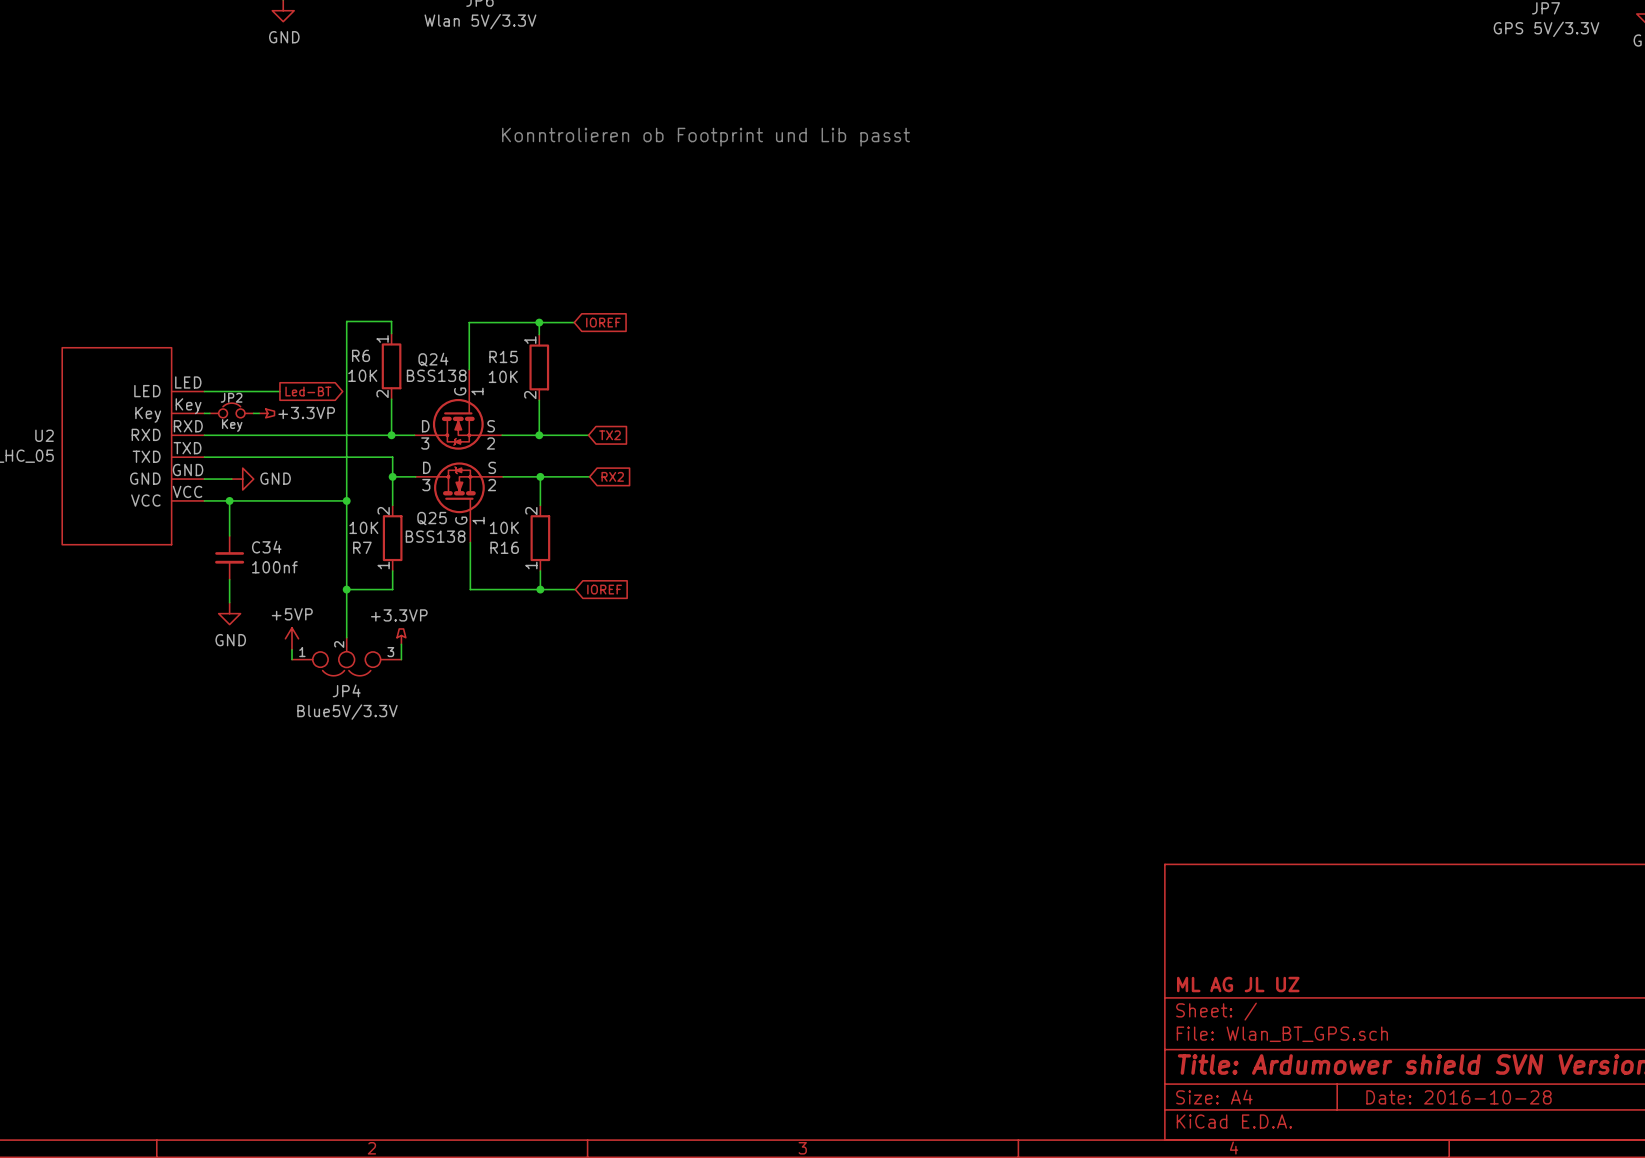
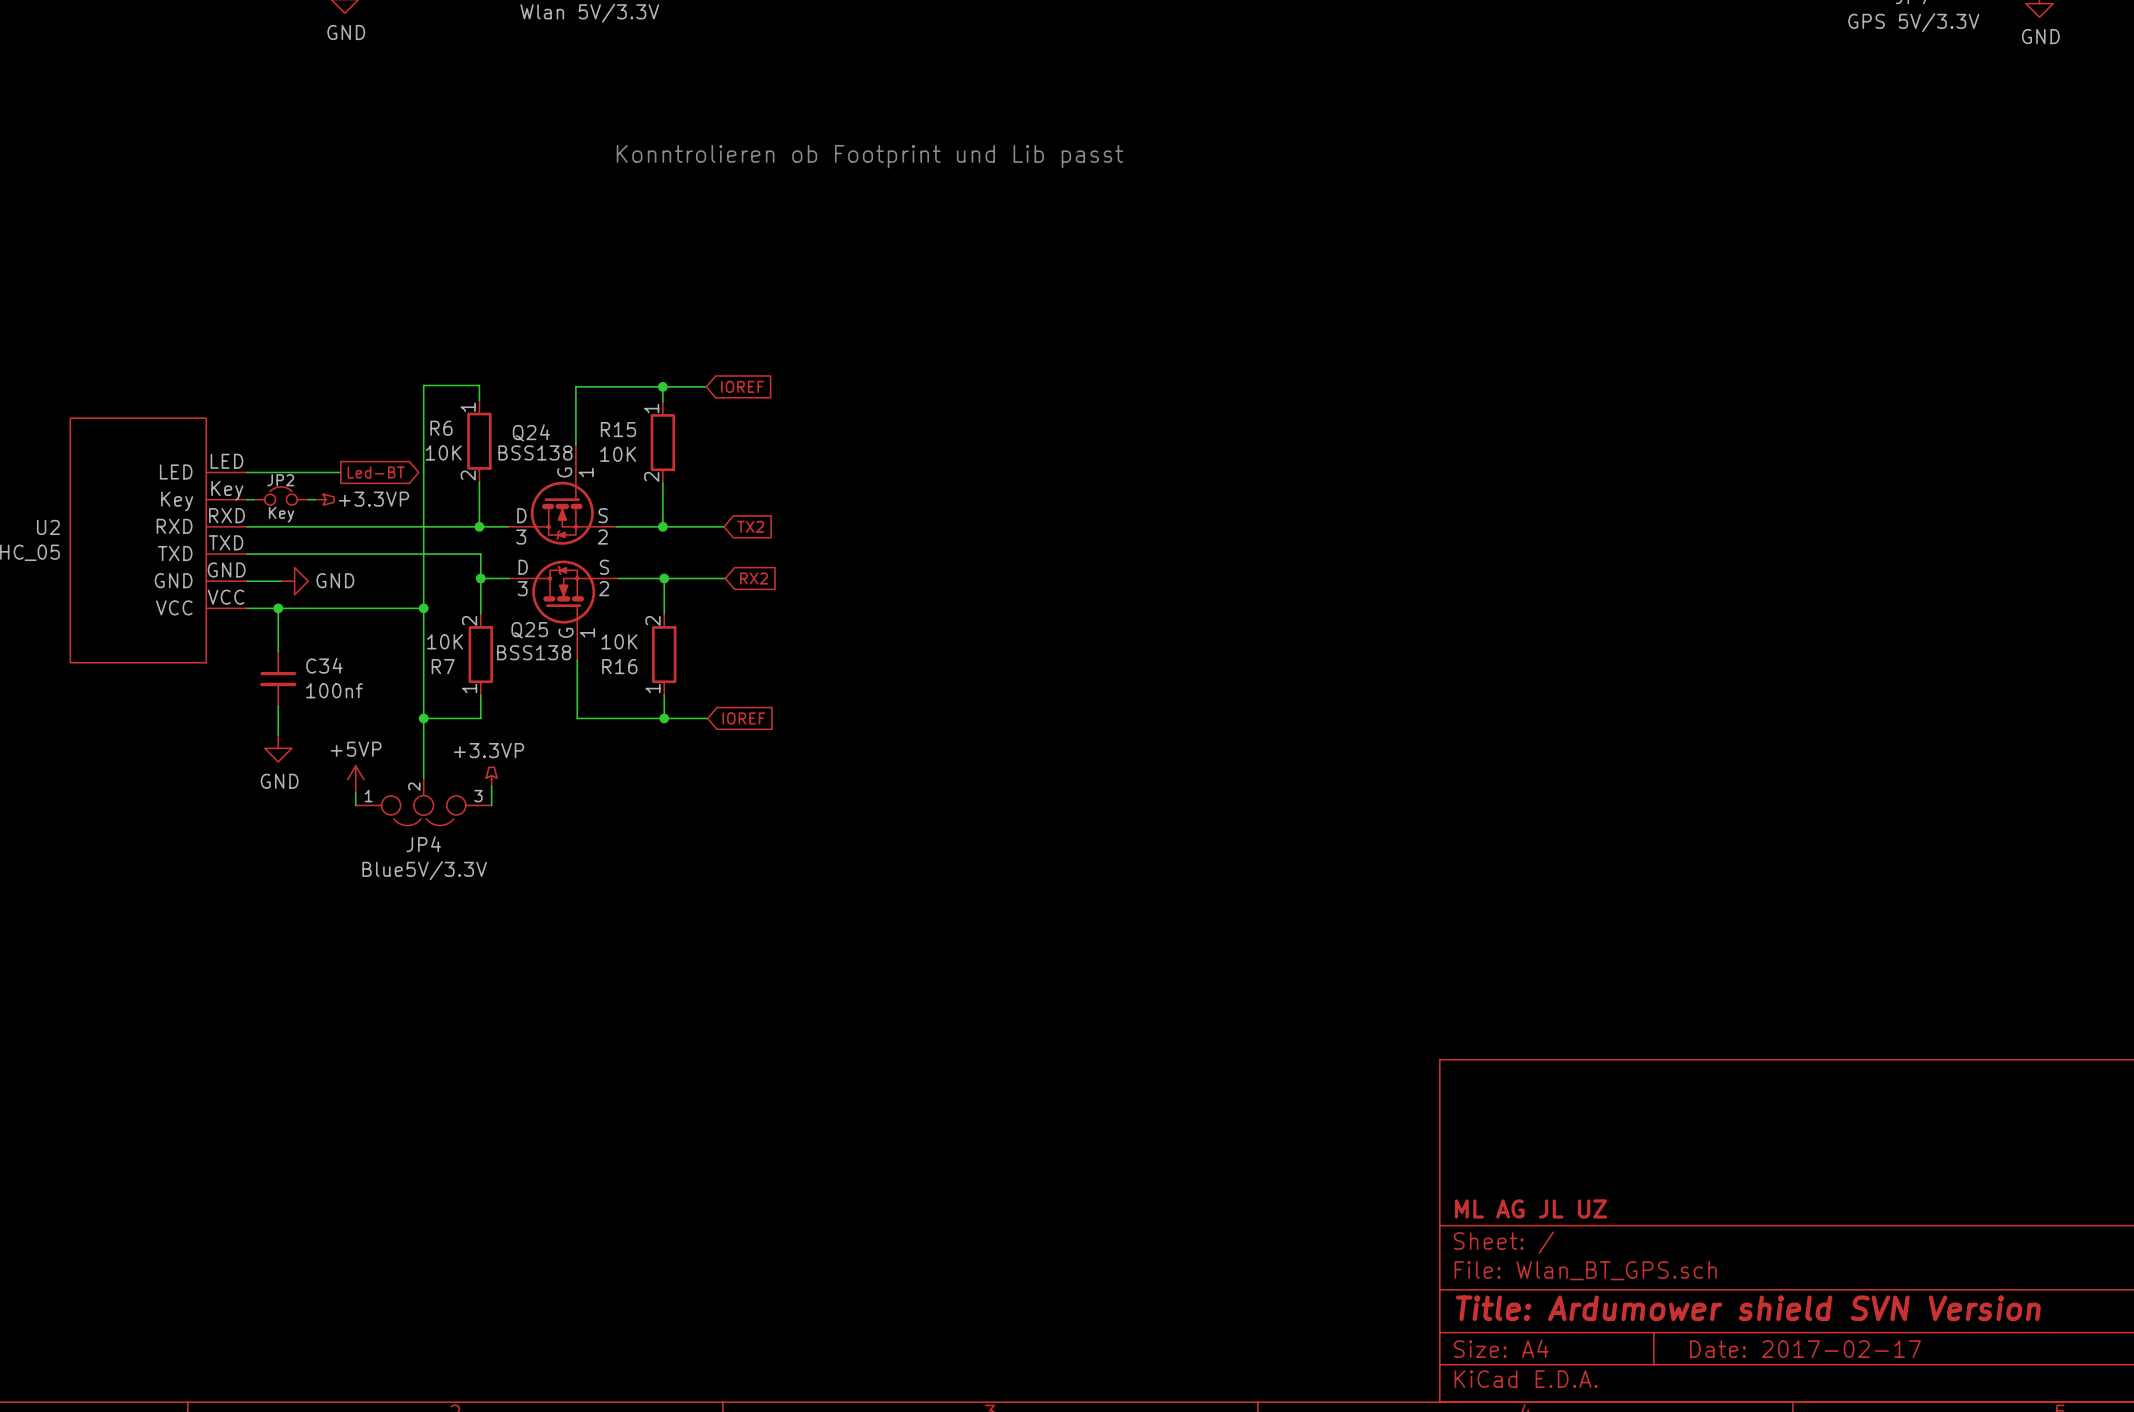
title block: Date: 2016-10-28 (1458, 1097) -> Date: 2017-02-17 (1805, 1349)

